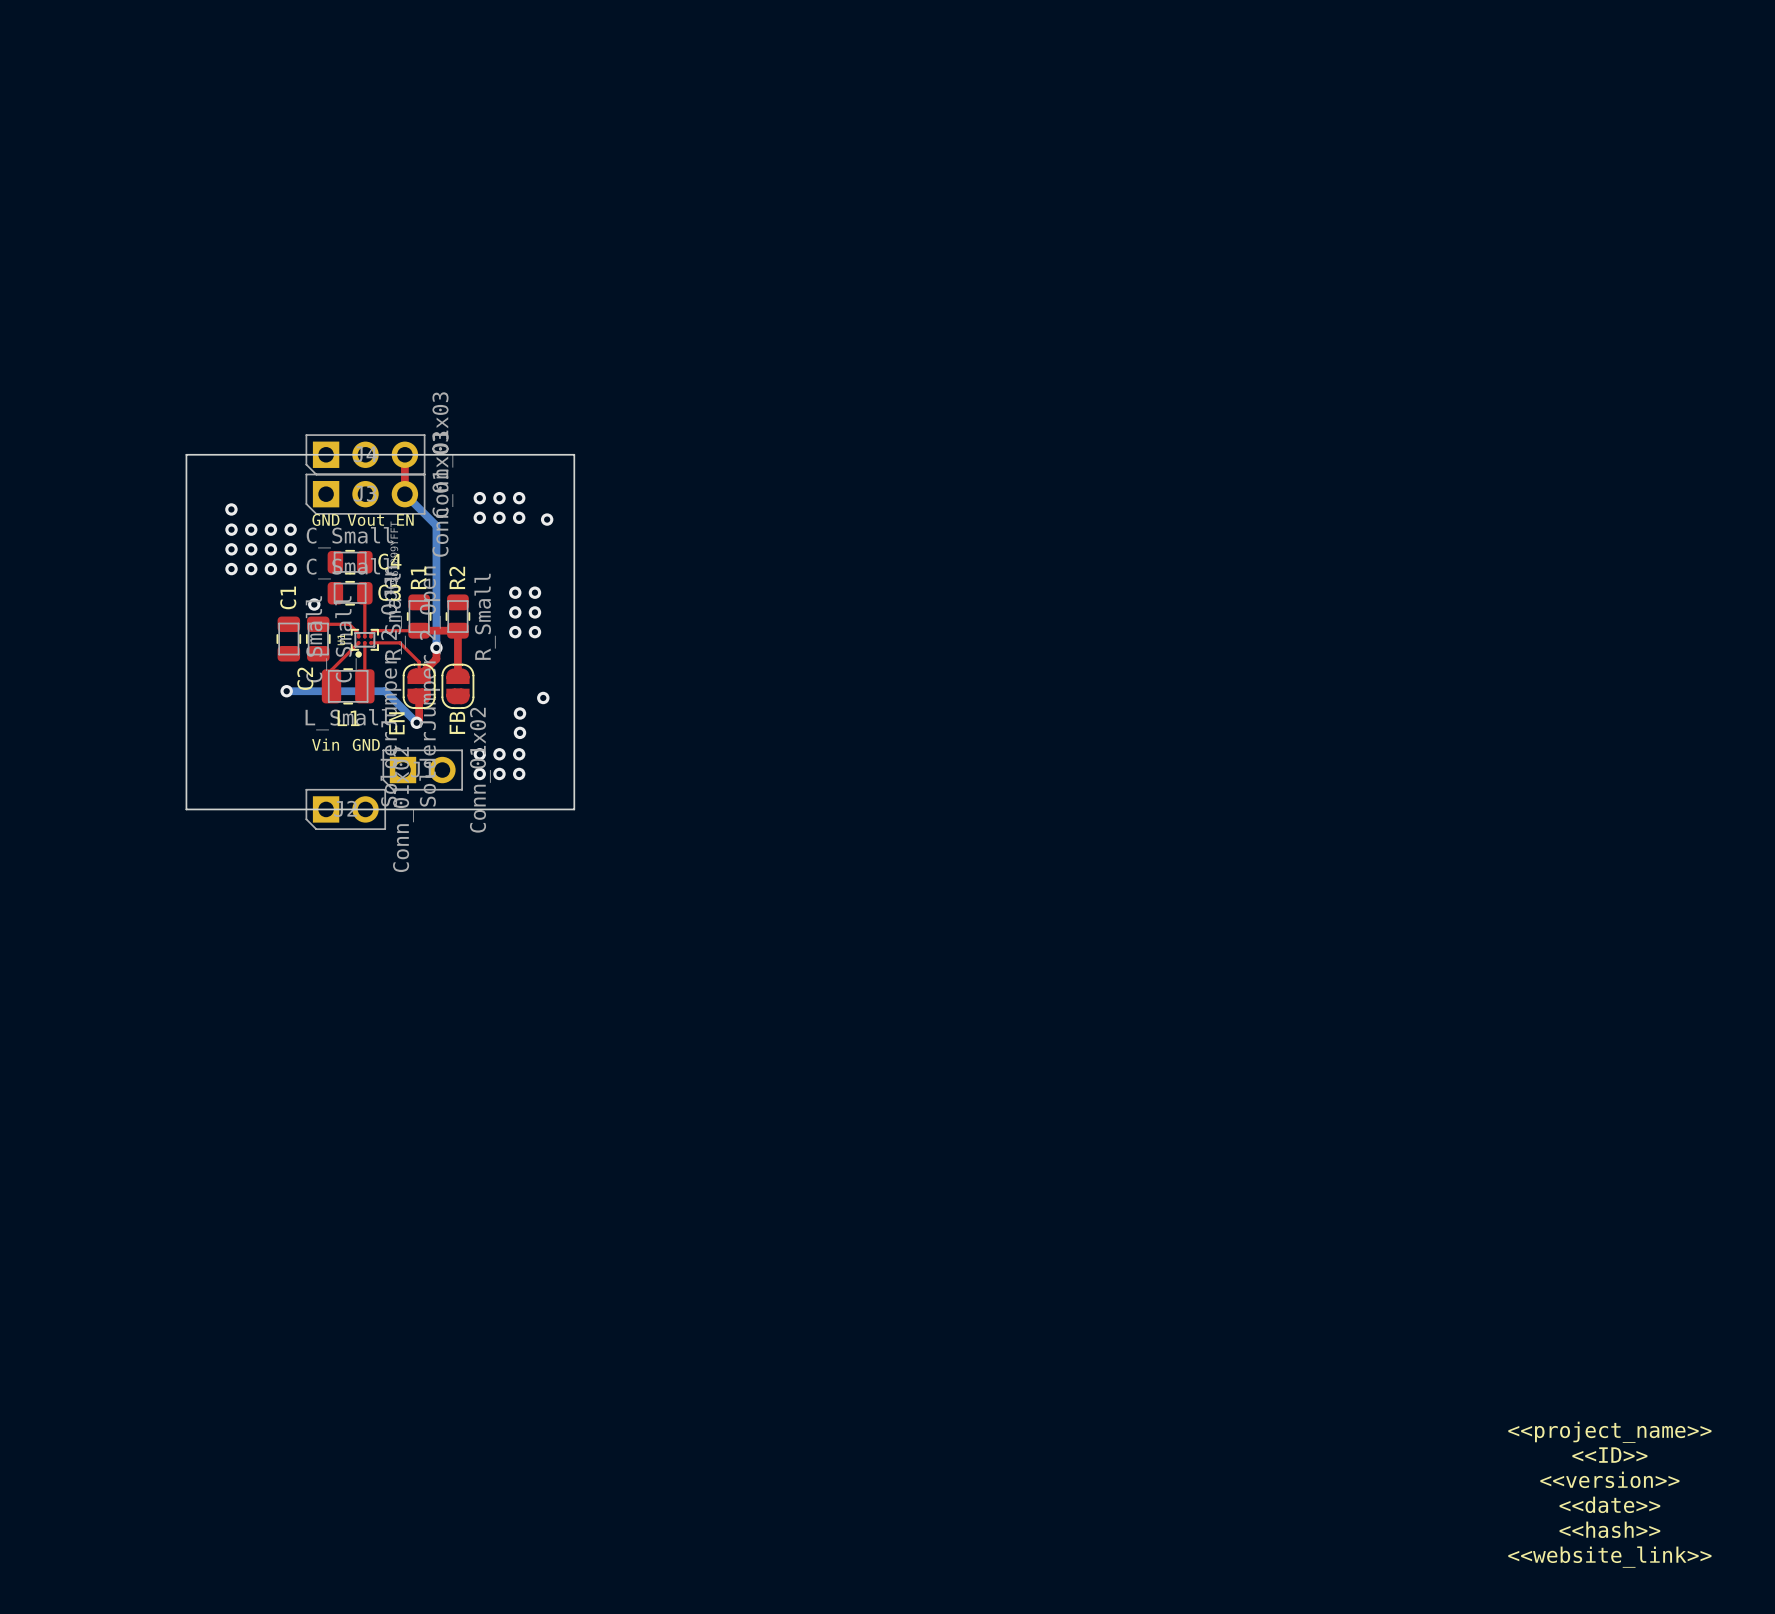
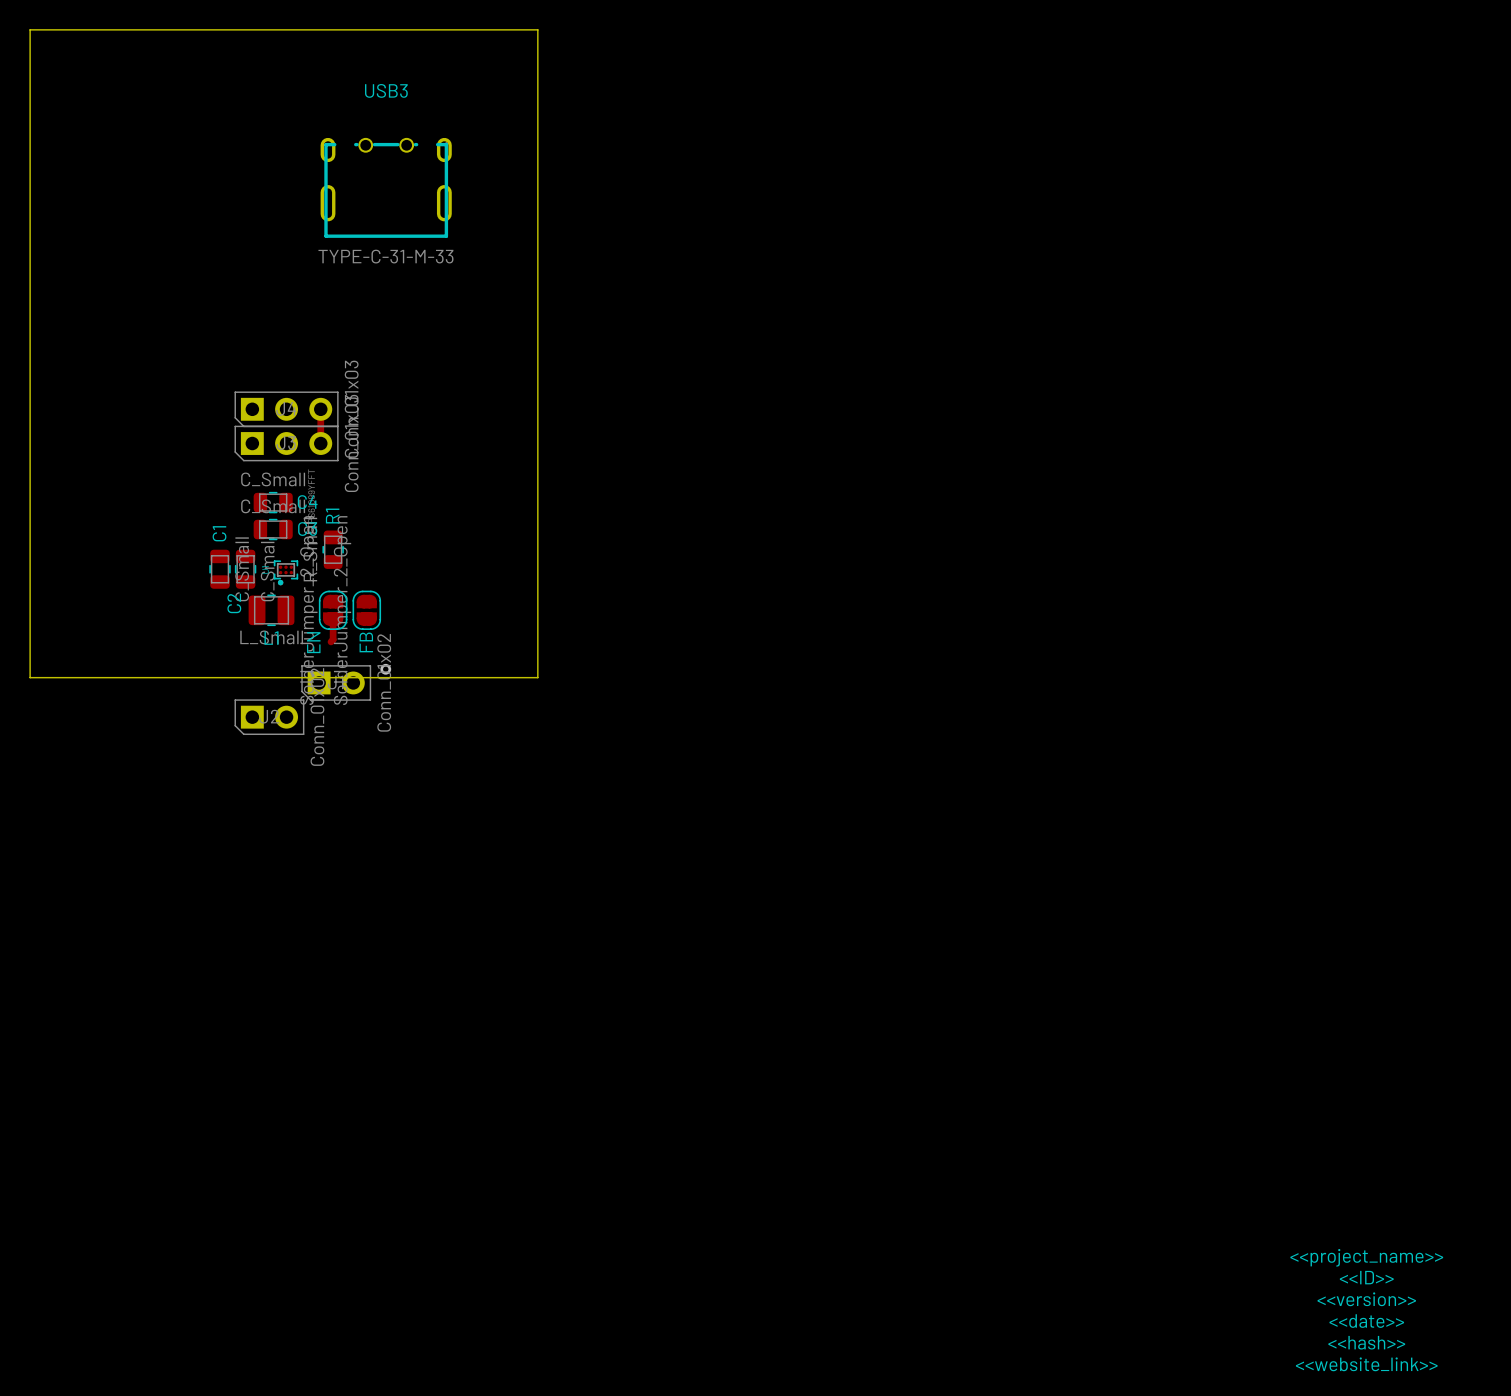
board edge: none -> (30, 29) (537, 29) (537, 677) (30, 677) (30, 29)
USB3: none -> TYPE-C-31-M-33 (386, 187)
board edge: (186, 454) (574, 454) (574, 809) (186, 809) (186, 454) -> none
bottom track: (404, 494) (436, 525) (436, 647) -> none
via: (479, 498) -> none
via: (499, 498) -> none
via: (519, 498) -> none
via: (231, 509) -> none
via: (479, 517) -> none
via: (499, 517) -> none
via: (519, 517) -> none
text: GND (325, 519) -> none
text: EN (405, 519) -> none
via: (547, 519) -> none
text: Vout (365, 520) -> none
via: (231, 529) -> none
via: (251, 529) -> none
via: (270, 529) -> none
via: (290, 529) -> none
via: (231, 549) -> none
via: (251, 549) -> none
via: (270, 549) -> none
via: (290, 549) -> none
via: (231, 569) -> none
via: (251, 569) -> none
via: (270, 569) -> none
via: (290, 569) -> none
via: (515, 592) -> none
via: (534, 592) -> none
top track: (364, 593) (364, 636) -> none
via: (314, 604) -> none
via: (515, 612) -> none
via: (534, 612) -> none
R2: R_Small (457, 616) -> none
top track: (318, 624) (349, 624) (358, 633) (358, 636) -> none
via: (515, 632) -> none
via: (534, 632) -> none
top track: (371, 636) (373, 630) (457, 630) (457, 676) -> none
top track: (358, 642) (331, 670) (331, 686) -> none
top track: (364, 642) (364, 686) -> none
top track: (371, 642) (399, 642) (419, 662) (419, 676) -> none
top track: (436, 647) (436, 658) (419, 676) -> none
via: (436, 647) -> none
bottom track: (286, 691) (385, 691) (416, 722) -> none
via: (286, 691) -> none
via: (543, 697) -> none
via: (519, 713) -> none
via: (416, 722) -> none
via: (519, 732) -> none
text: Vin (325, 744) -> none
text: GND (366, 744) -> none
via: (499, 754) -> none
via: (519, 754) -> none
via: (479, 773) -> none
via: (499, 773) -> none
via: (519, 773) -> none

